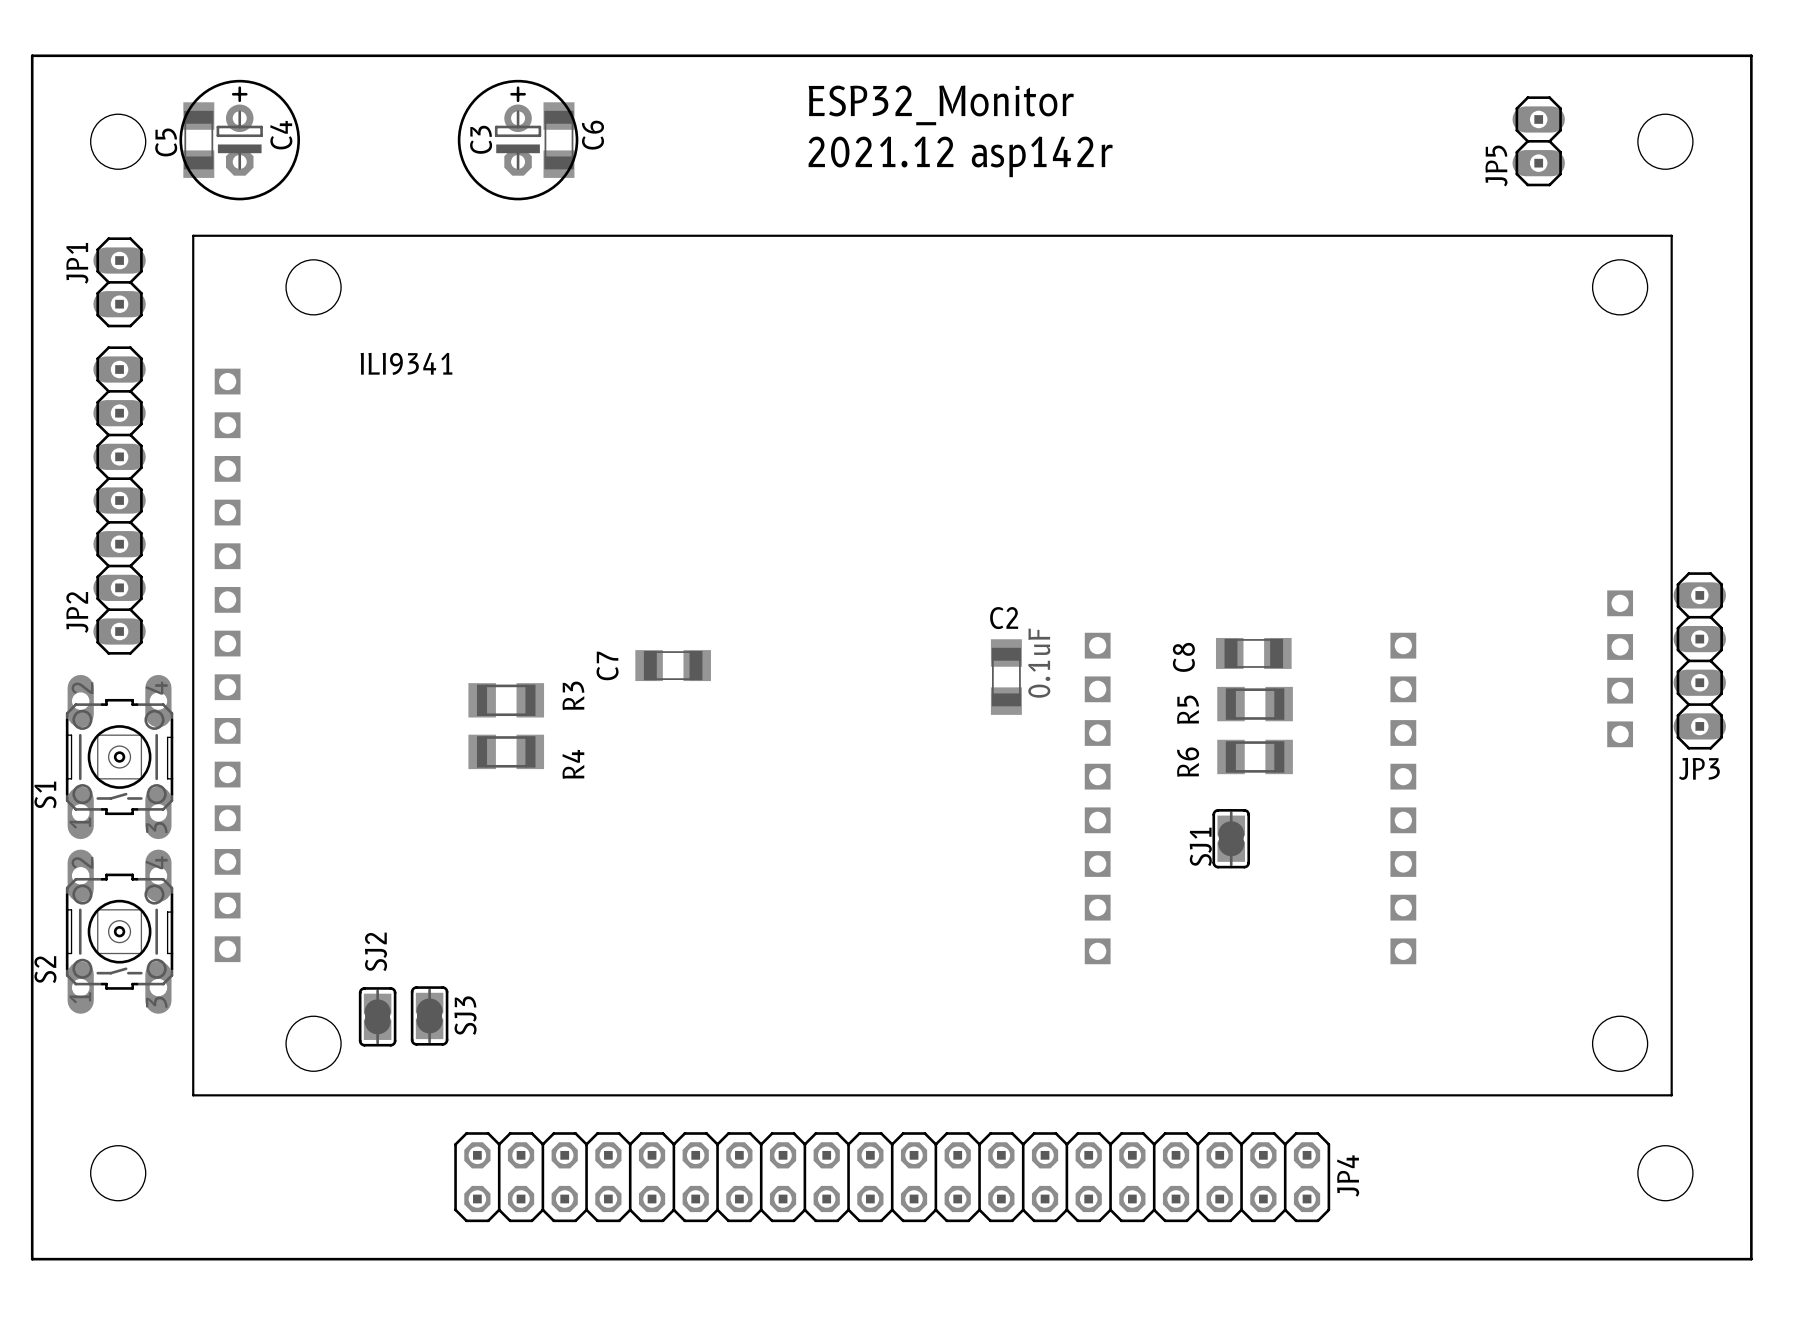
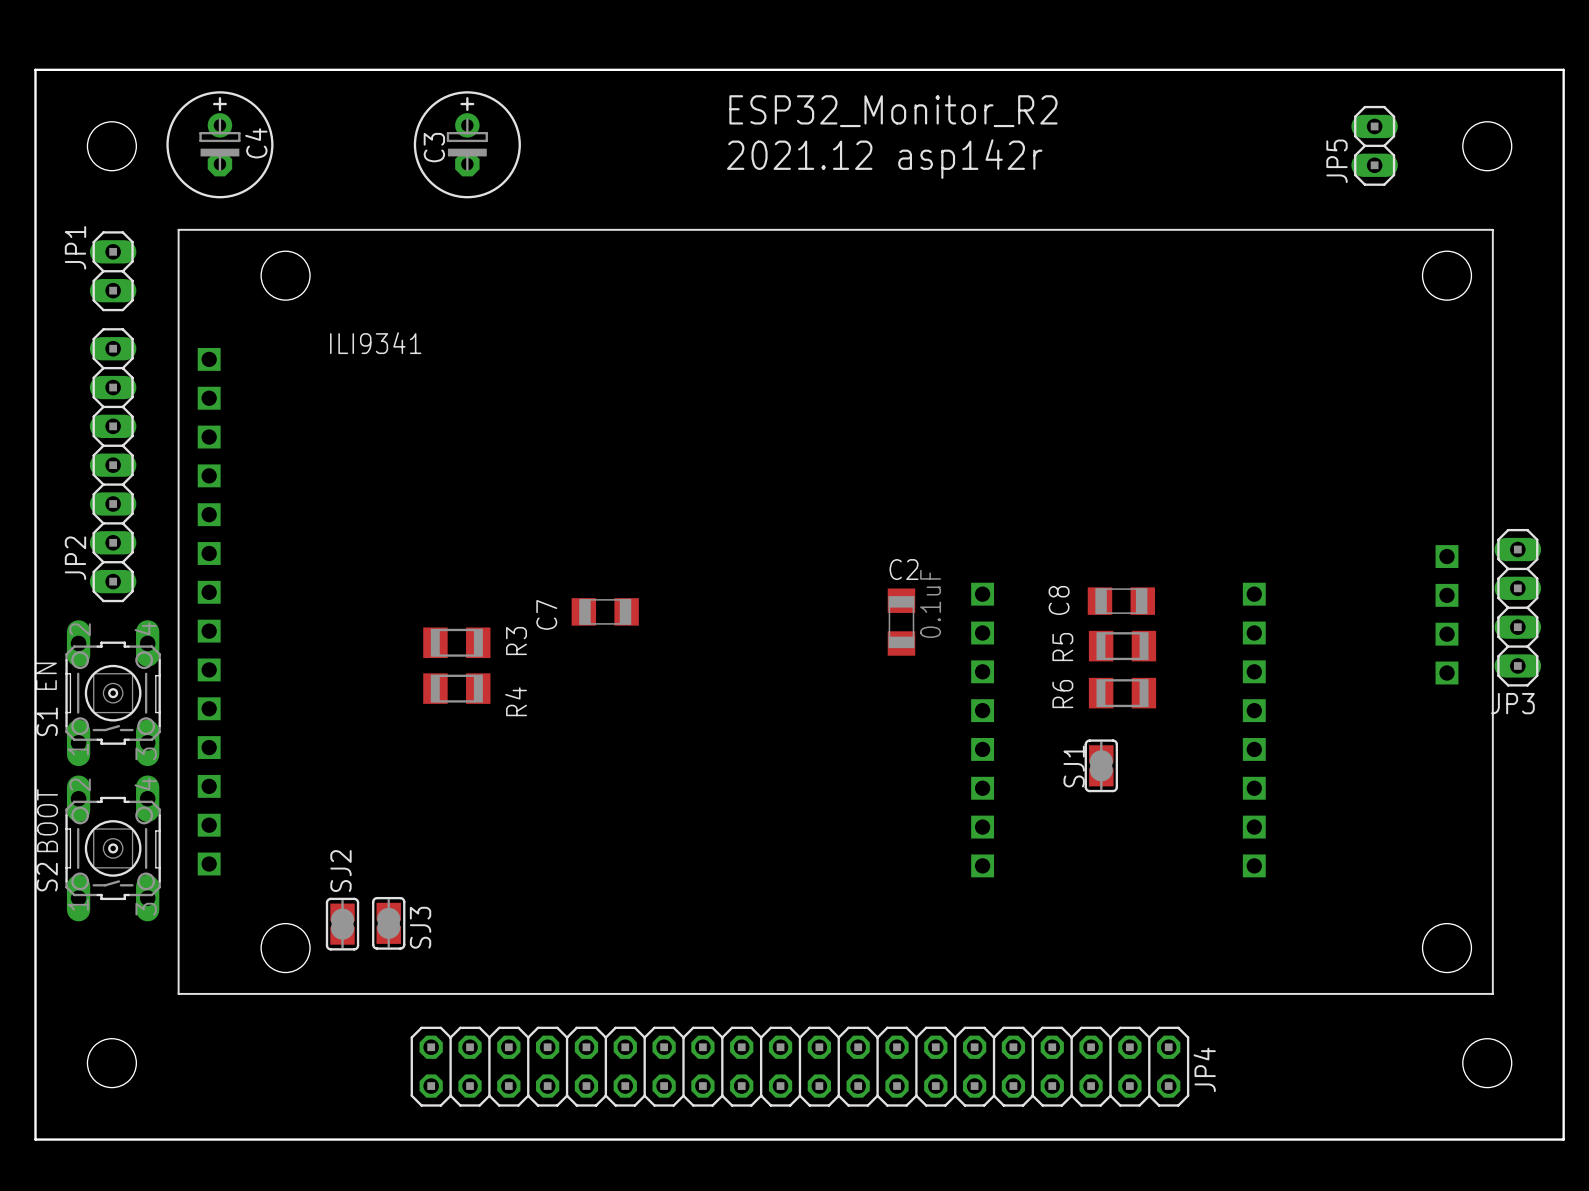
text: ESP32_Monitor (941, 105) -> ESP32_Monitor_R2 (893, 111)
C5: (198, 140) -> none
C6: (558, 140) -> none
text: none -> EN (46, 676)
text: none -> BOOT (47, 820)

